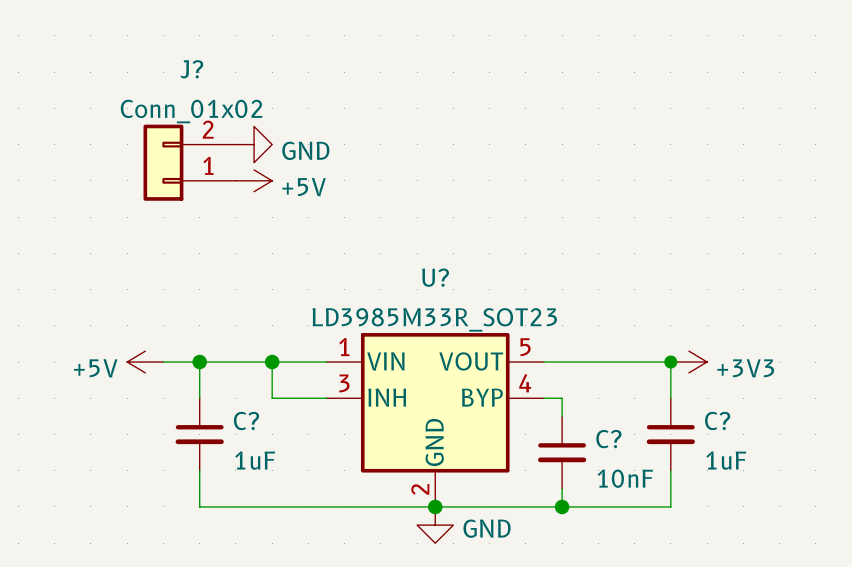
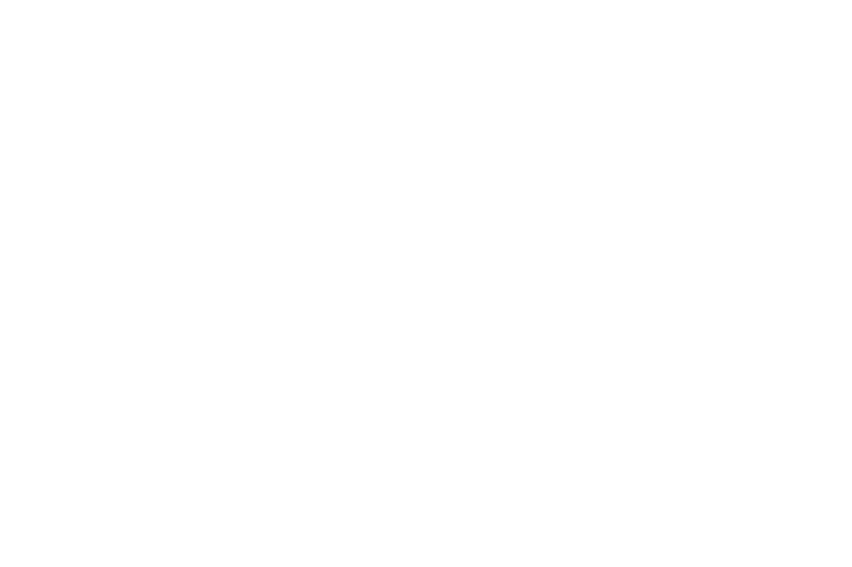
power symbol: GND (254, 144) -> none
J?: Conn_01x02 (189, 162) -> none
power symbol: +5V (254, 180) -> none
power symbol: +5V (145, 362) -> none
wire: (163, 362) (326, 362) -> none
wire: (199, 362) (199, 398) -> none
junction: (199, 362) -> none
wire: (272, 362) (272, 398) (326, 398) -> none
junction: (272, 362) -> none
wire: (543, 362) (670, 362) (670, 398) -> none
junction: (670, 362) -> none
power symbol: +3V3 (688, 362) -> none
wire: (543, 398) (562, 398) (562, 416) -> none
U?: LD3985M33R_SOT23 (435, 420) -> none
C?: 1uF (199, 434) -> none
C?: 1uF (670, 434) -> none
C?: 10nF (562, 452) -> none
wire: (199, 470) (199, 506) (670, 506) (670, 470) -> none
wire: (562, 488) (562, 506) -> none
junction: (435, 506) -> none
junction: (562, 506) -> none
power symbol: GND (435, 525) -> none

